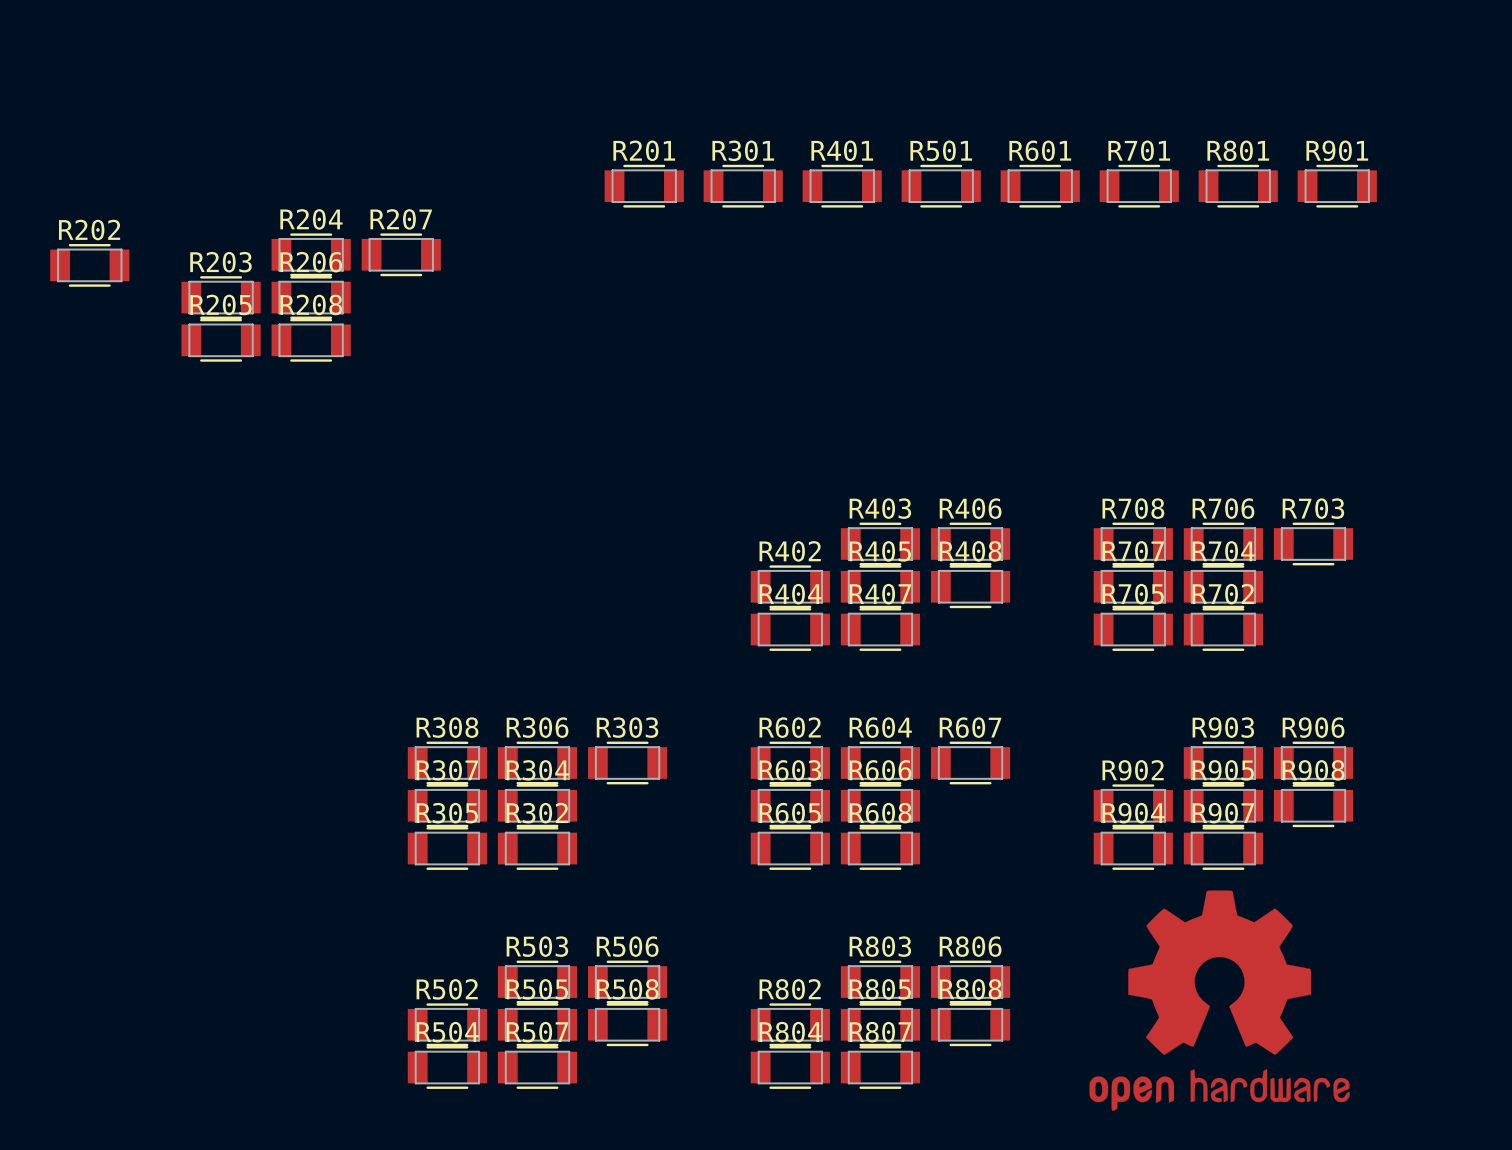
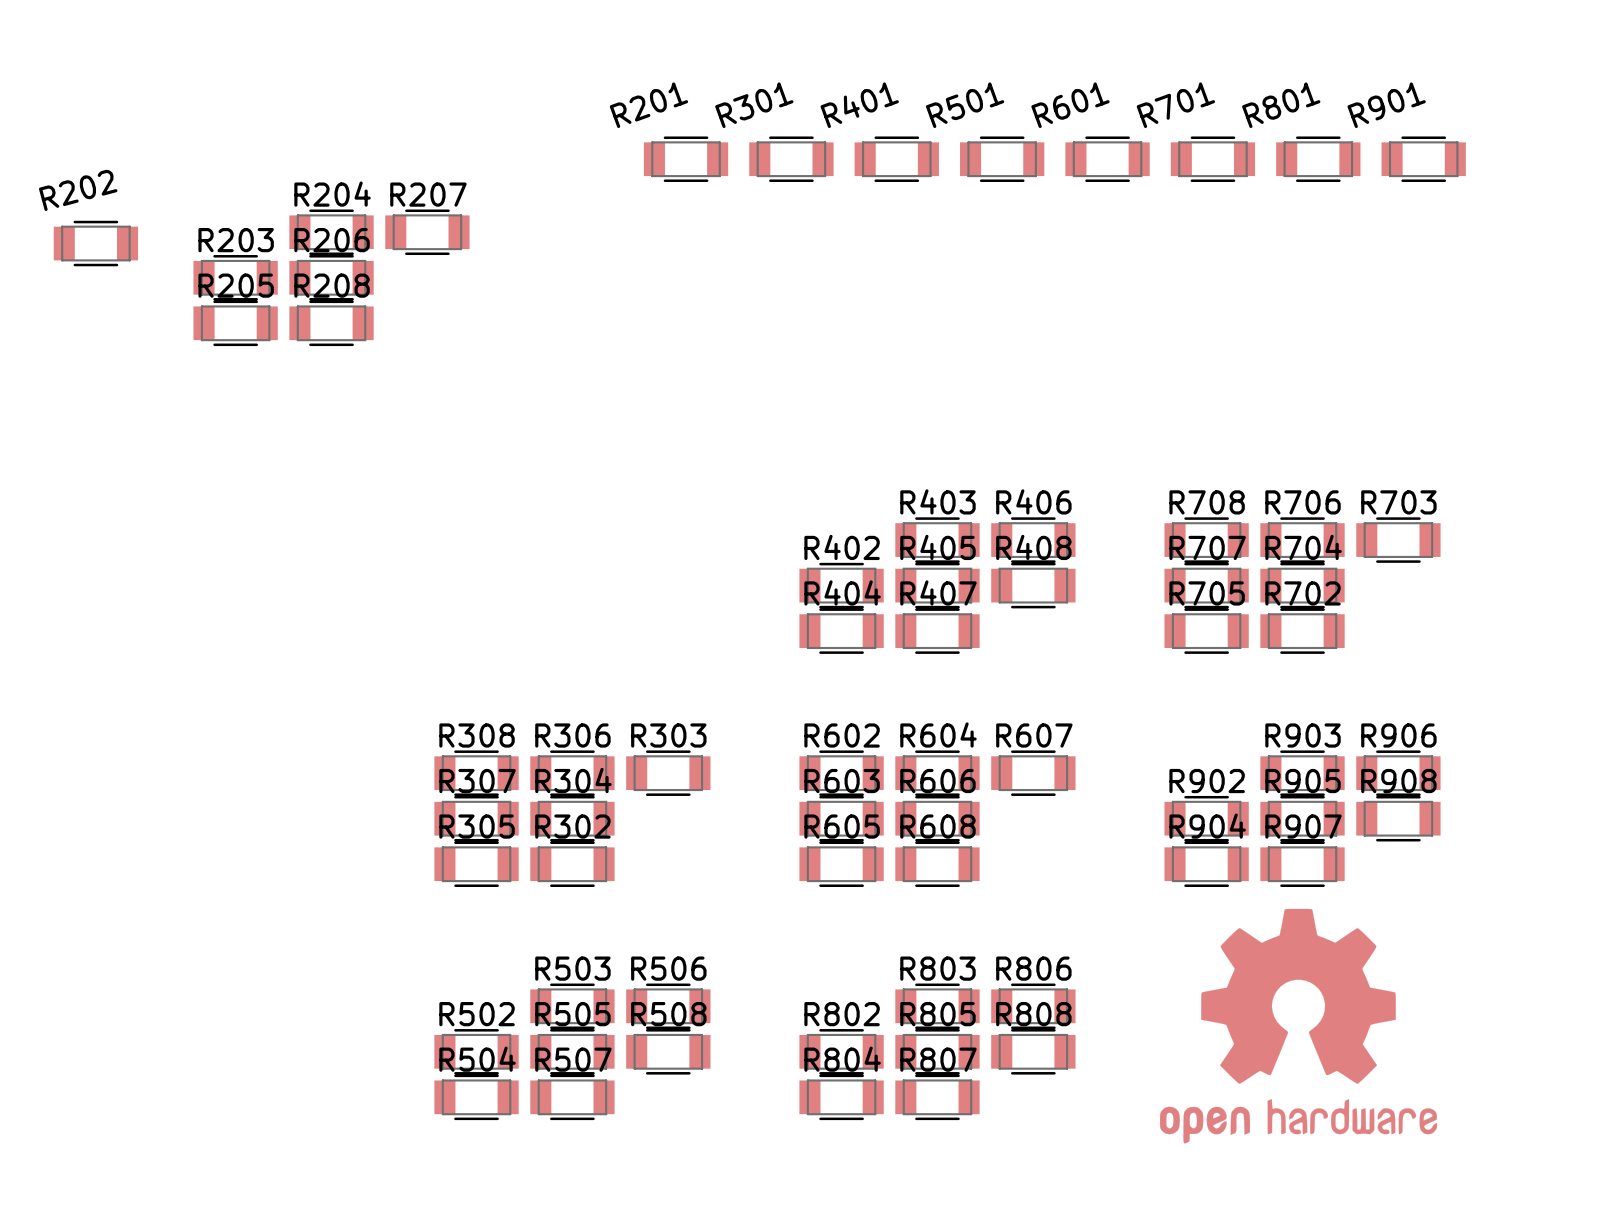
R201 name rotation: 0° (644, 150) -> 20° counterclockwise (648, 105)
R301 name rotation: 0° (743, 150) -> 20° counterclockwise (754, 105)
R401 name rotation: 0° (842, 150) -> 20° counterclockwise (859, 105)
R501 name rotation: 0° (941, 150) -> 20° counterclockwise (965, 105)
R601 name rotation: 0° (1040, 150) -> 20° counterclockwise (1070, 105)
R701 name rotation: 0° (1139, 150) -> 20° counterclockwise (1175, 105)
R801 name rotation: 0° (1238, 150) -> 20° counterclockwise (1281, 105)
R901 name rotation: 0° (1337, 150) -> 20° counterclockwise (1386, 105)
R202 name rotation: 0° (89, 230) -> 15° counterclockwise (78, 190)

